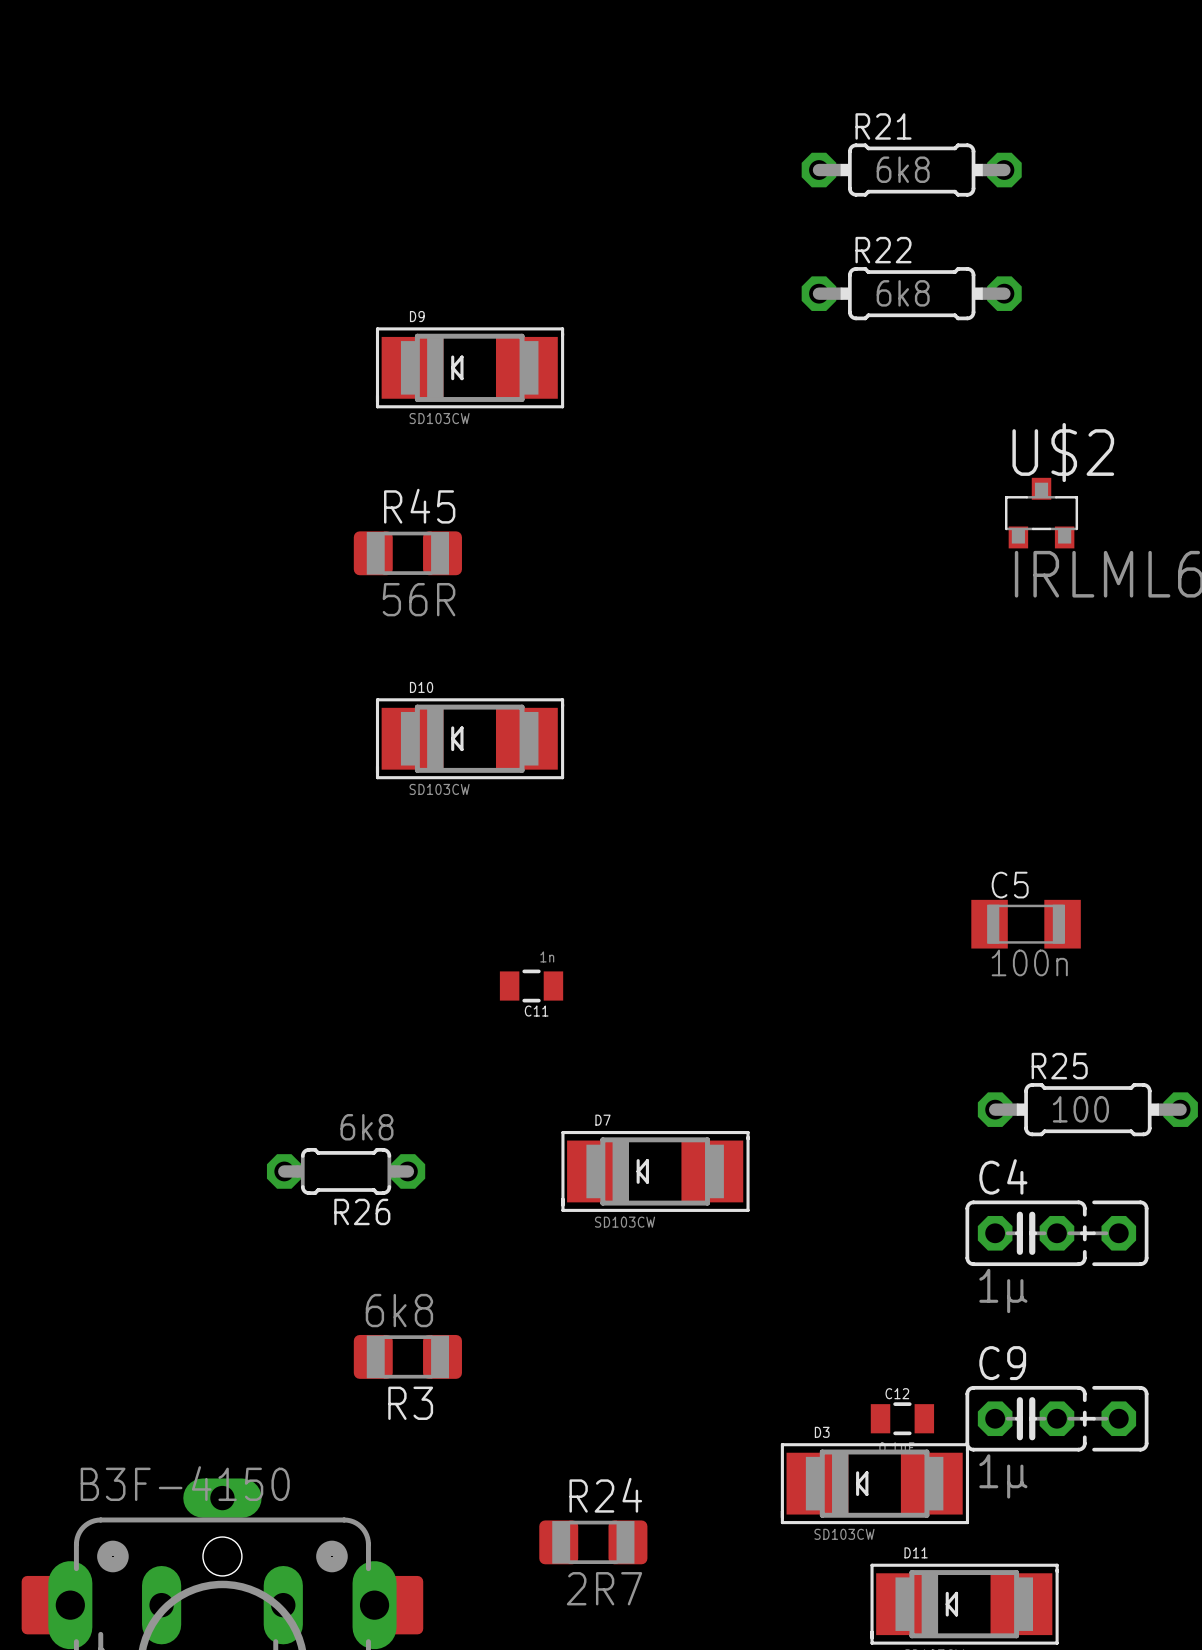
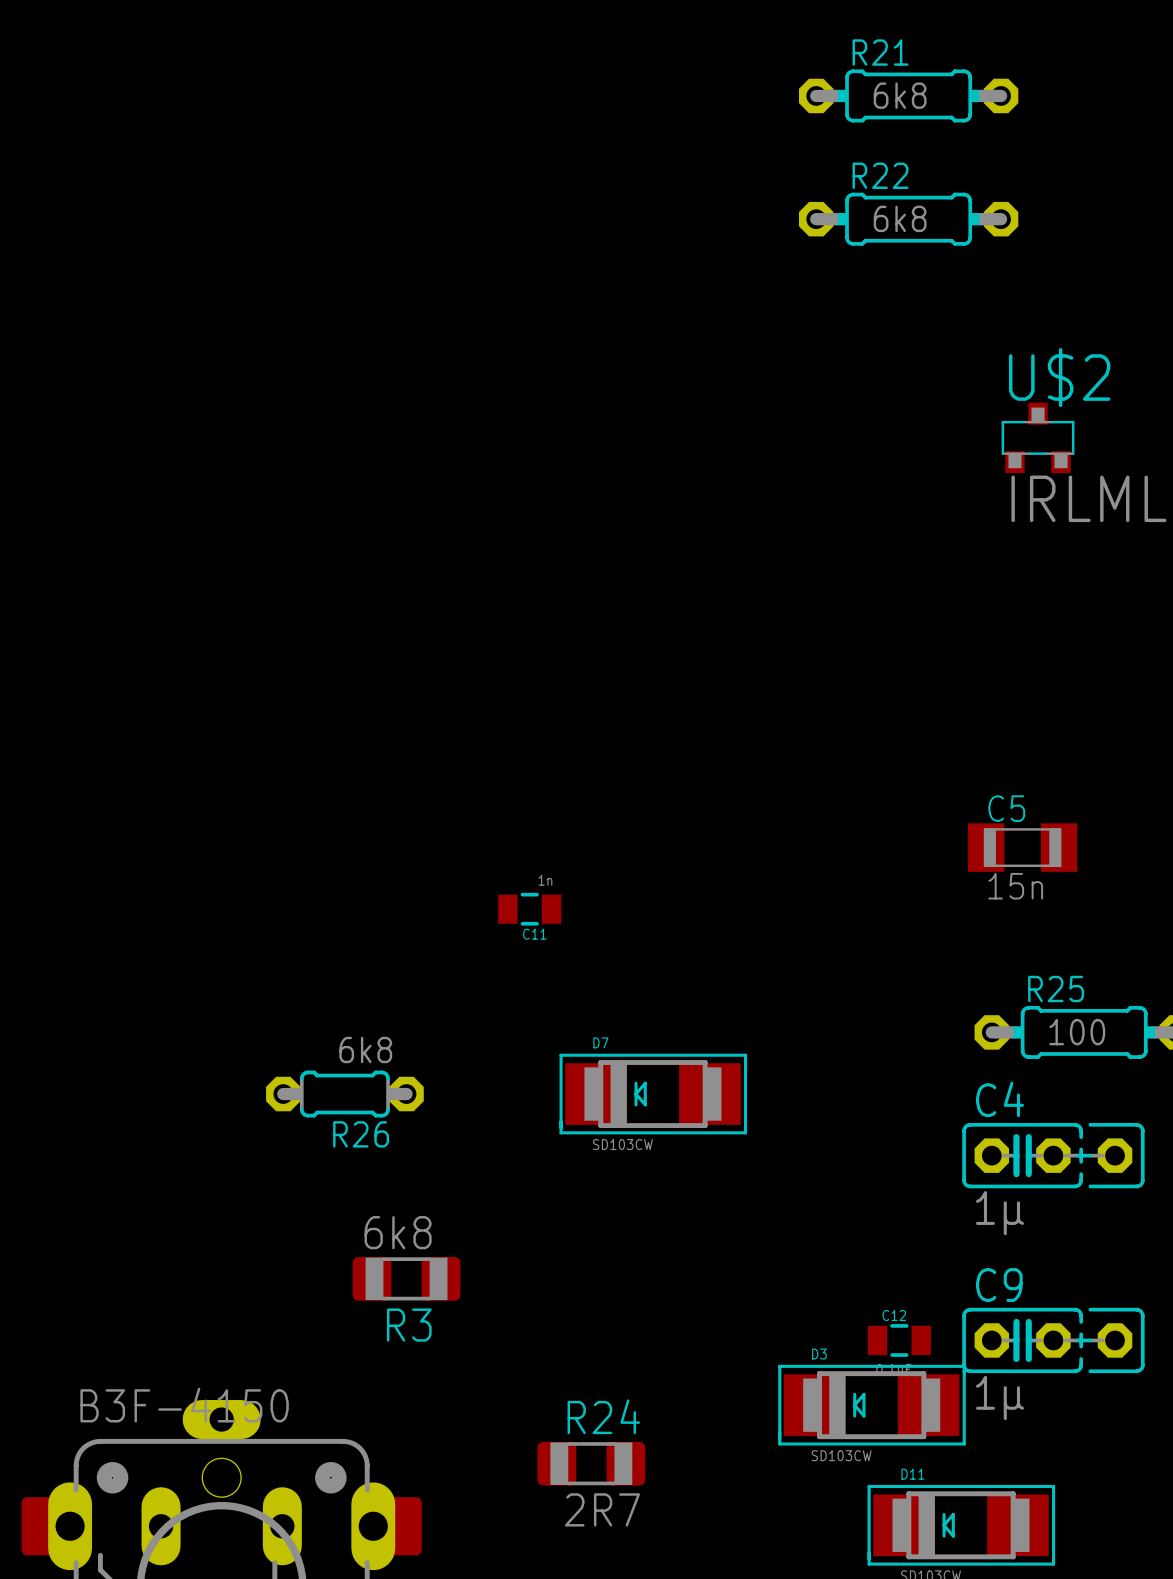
D9: SD103CW (470, 367) -> none
R45: 56R (407, 553) -> none
D10: SD103CW (470, 738) -> none
C5 value: 100n (1029, 962) -> 15n (1015, 886)

